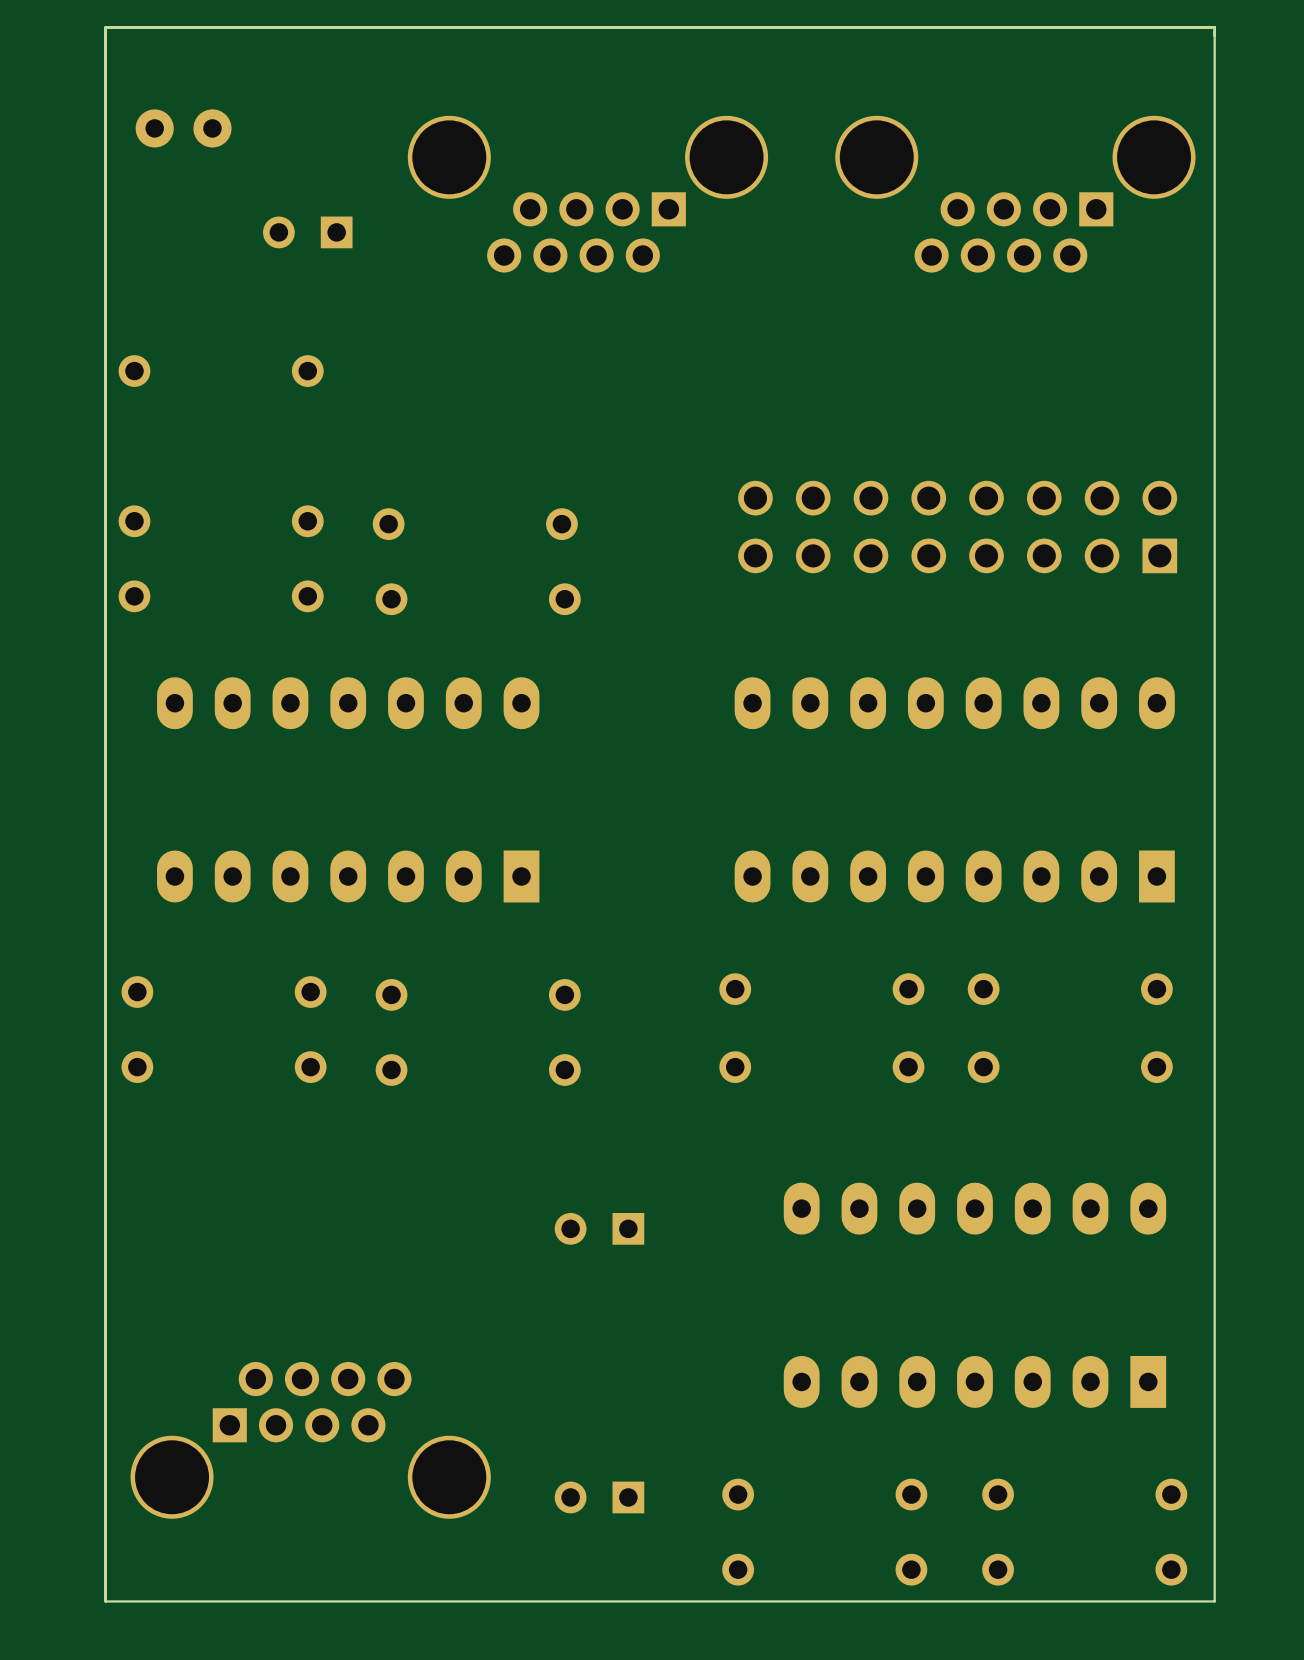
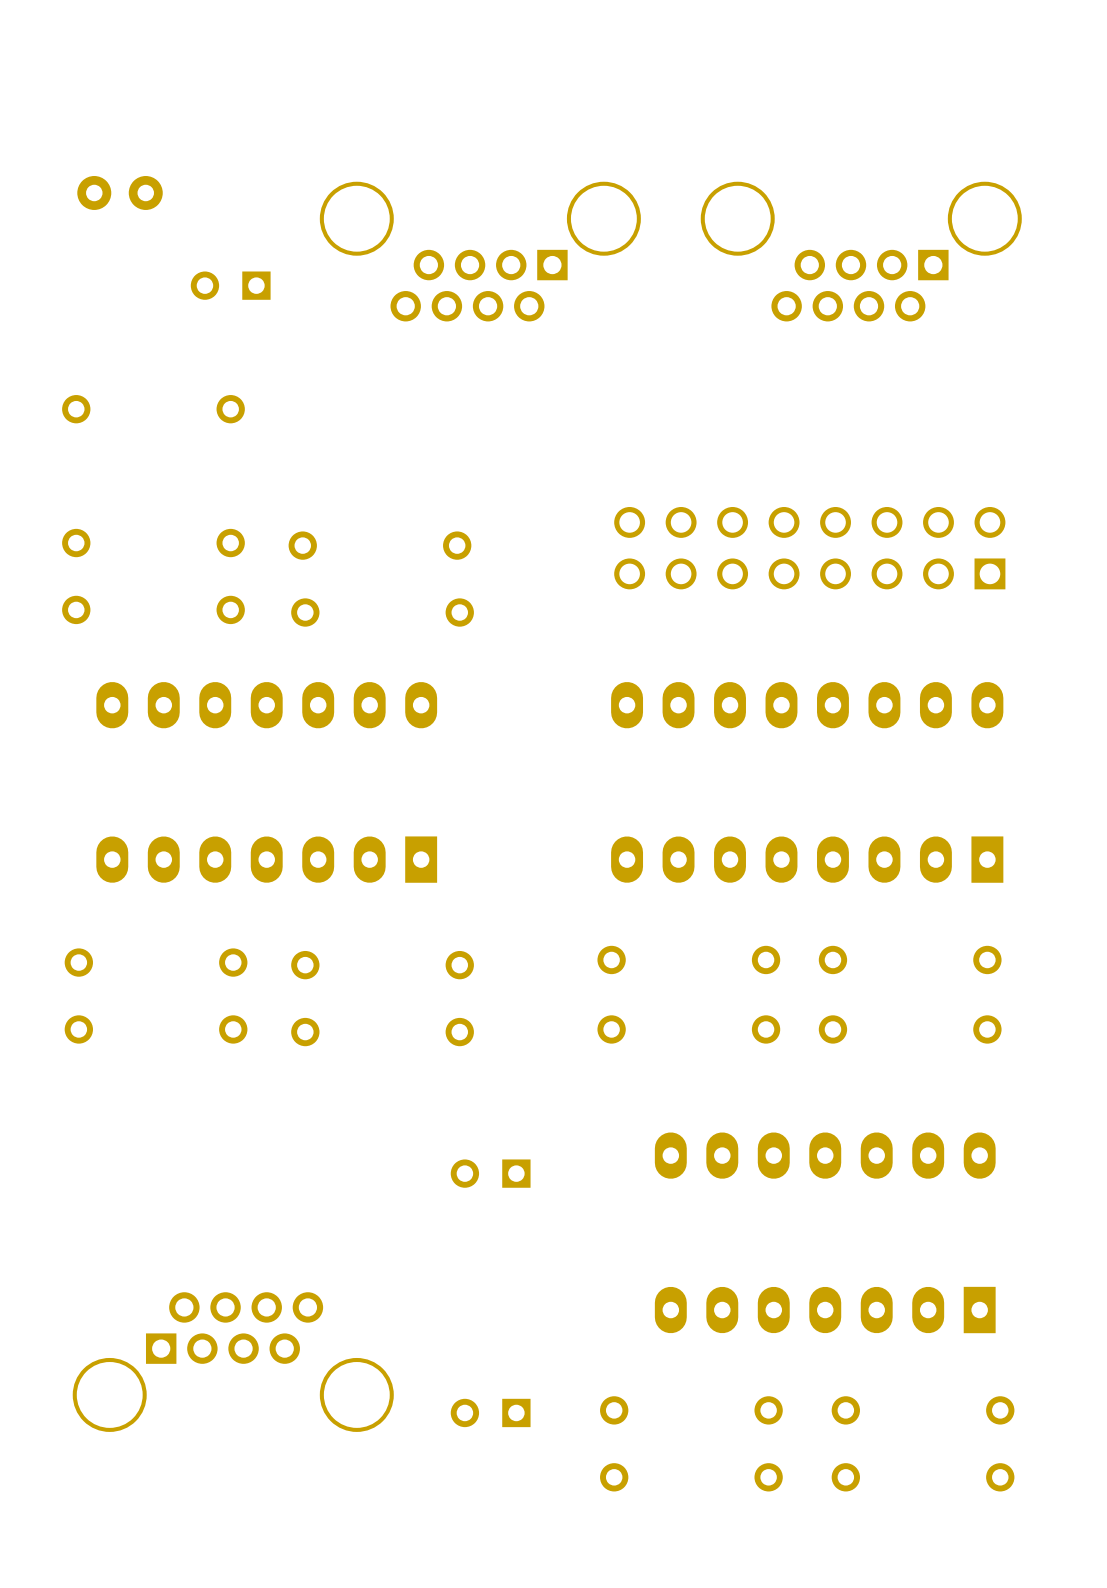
board edge: (1214, 27) (105, 27) (105, 1601) (1214, 1601) (1214, 27) -> none

